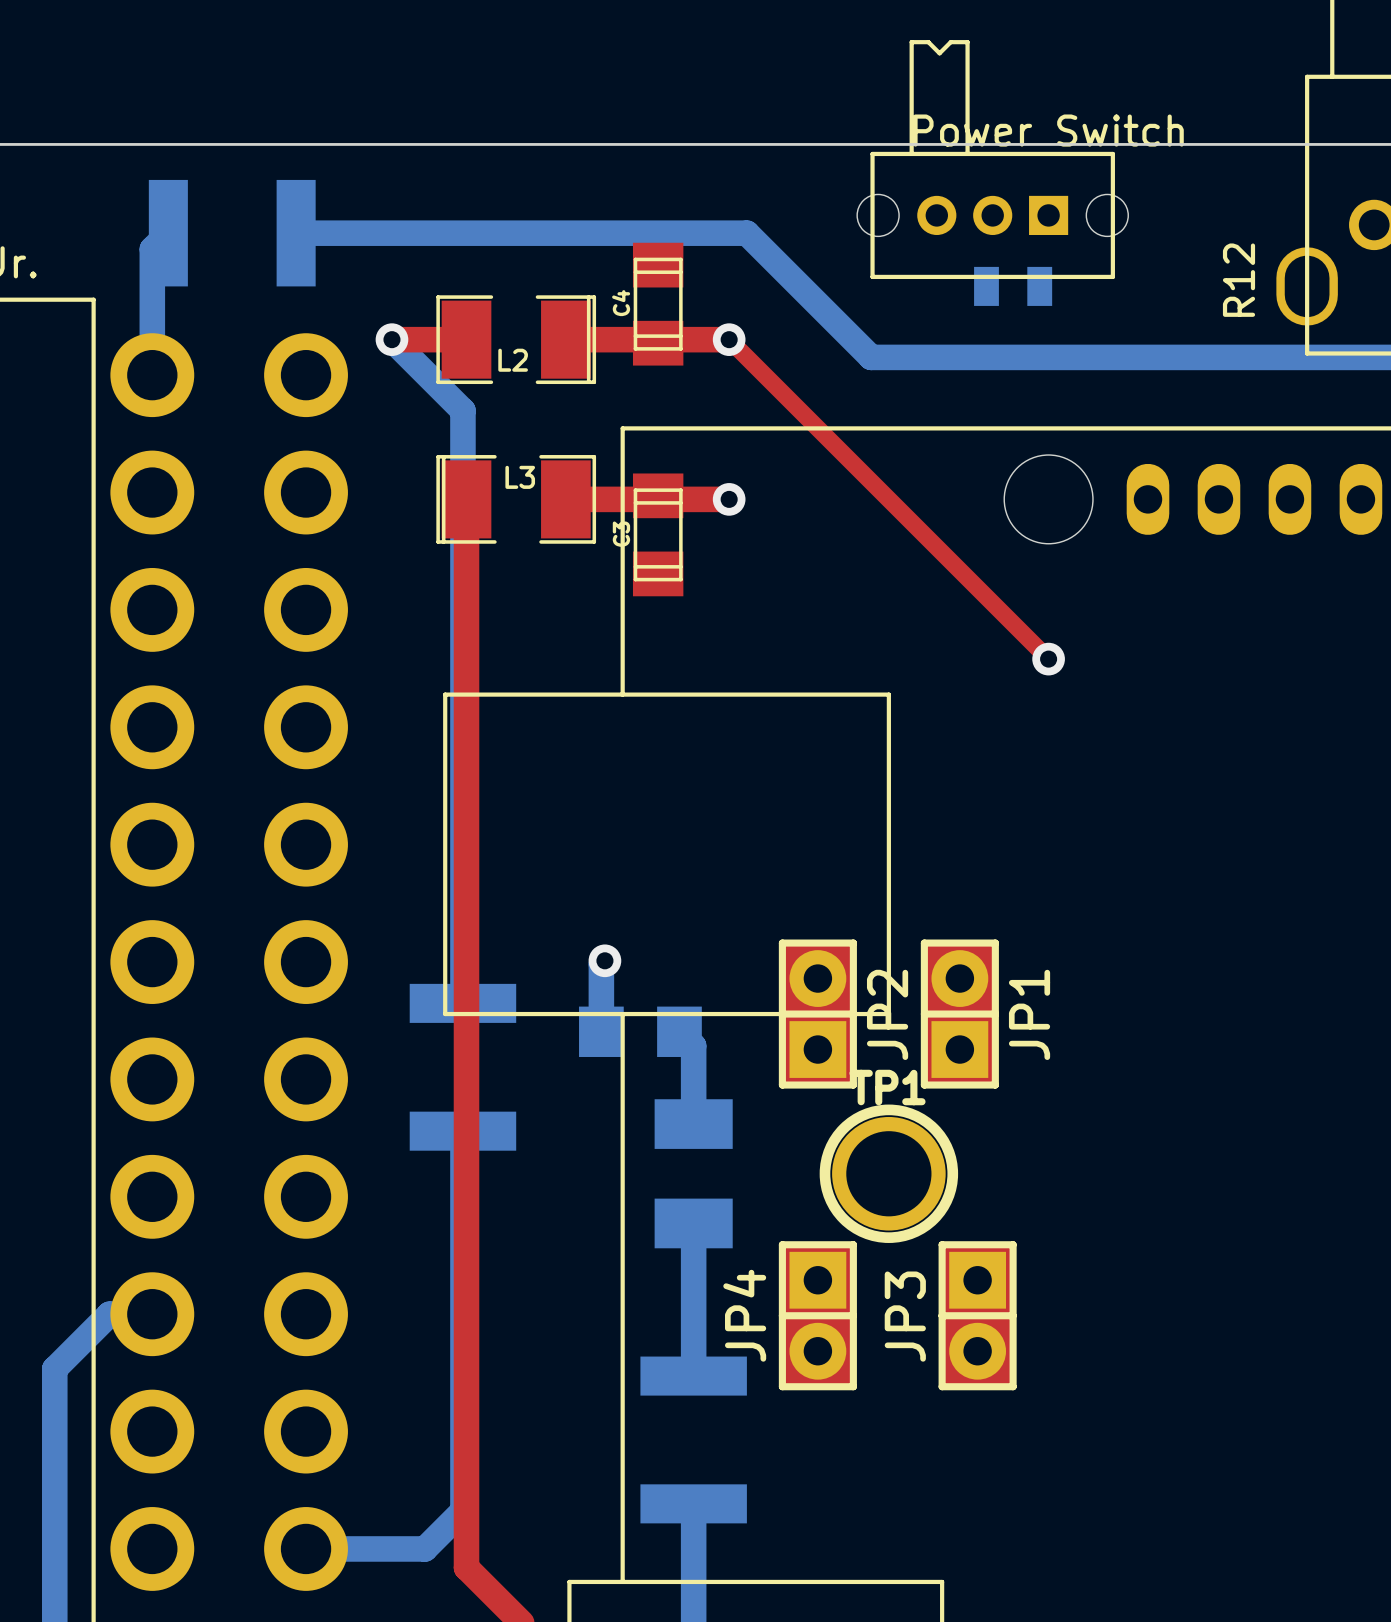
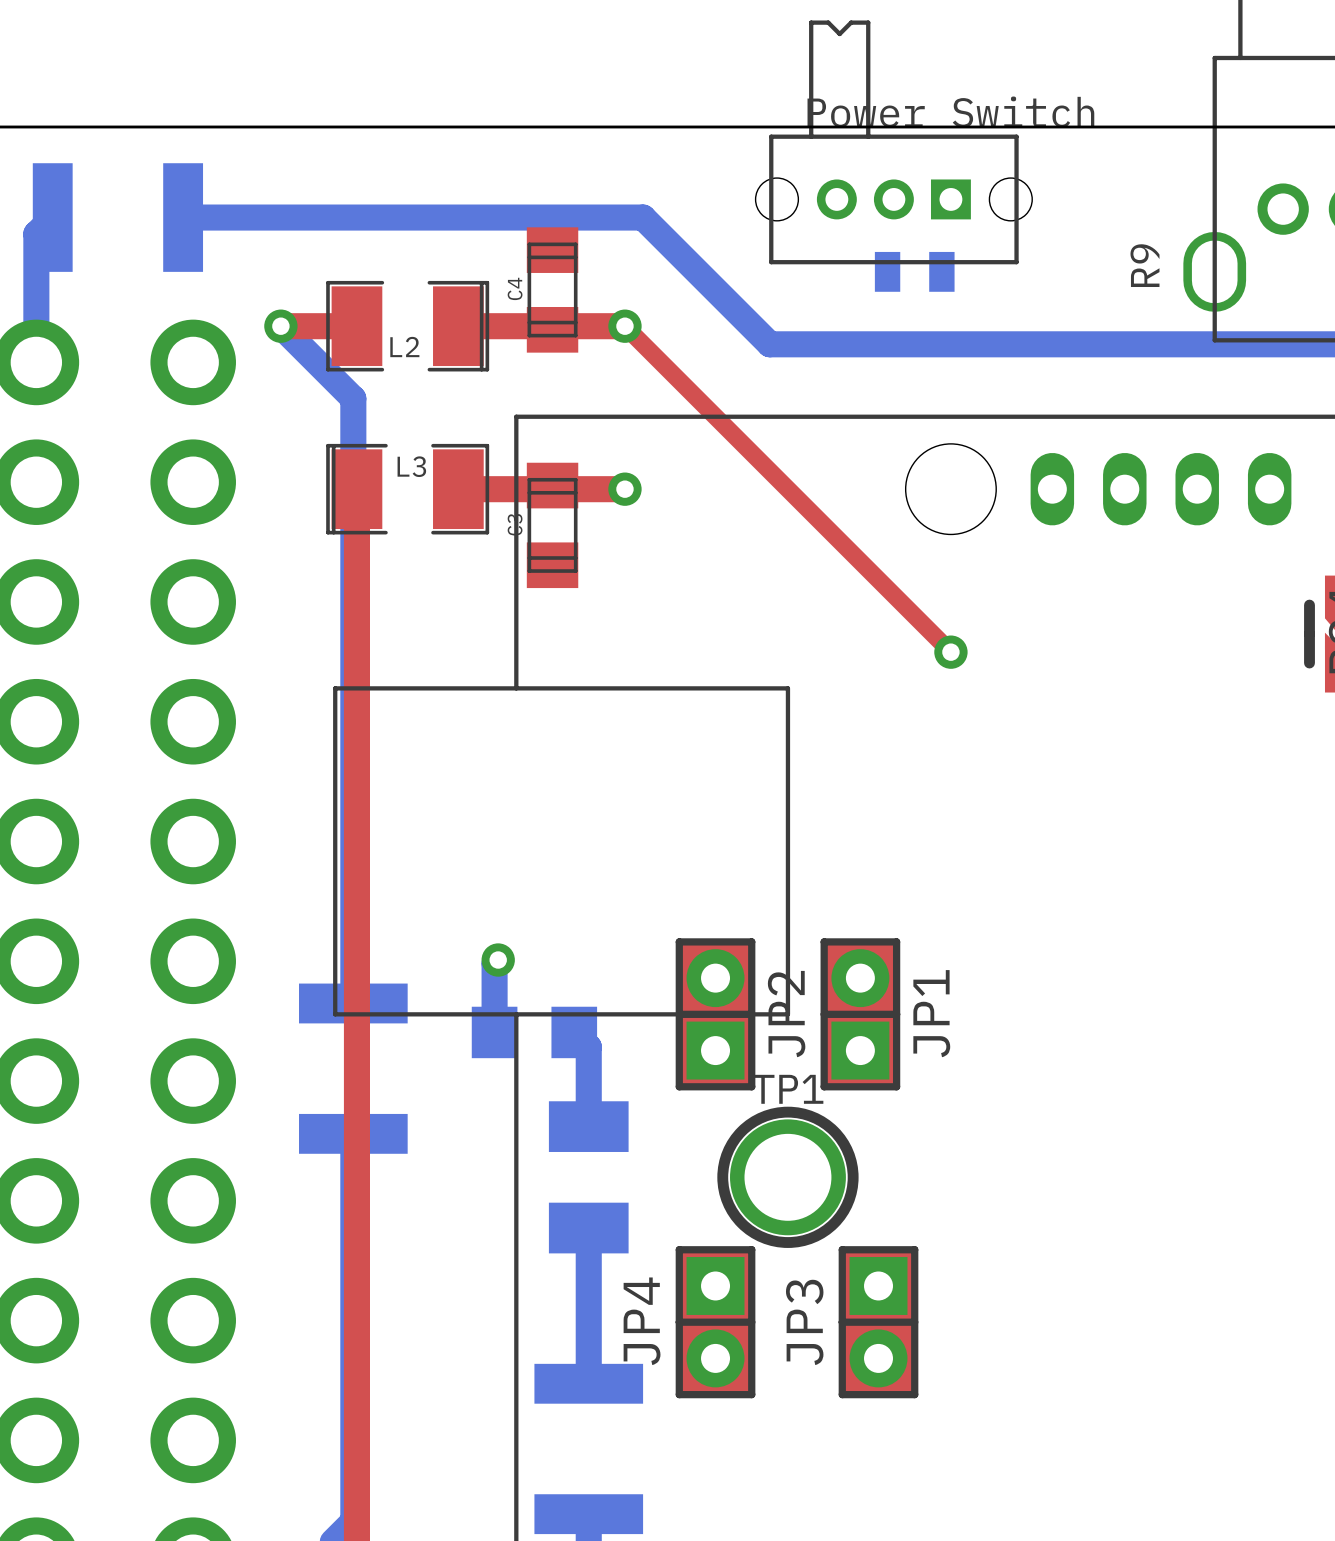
R12 name: R12 (1239, 280) -> R9 (1144, 265)

